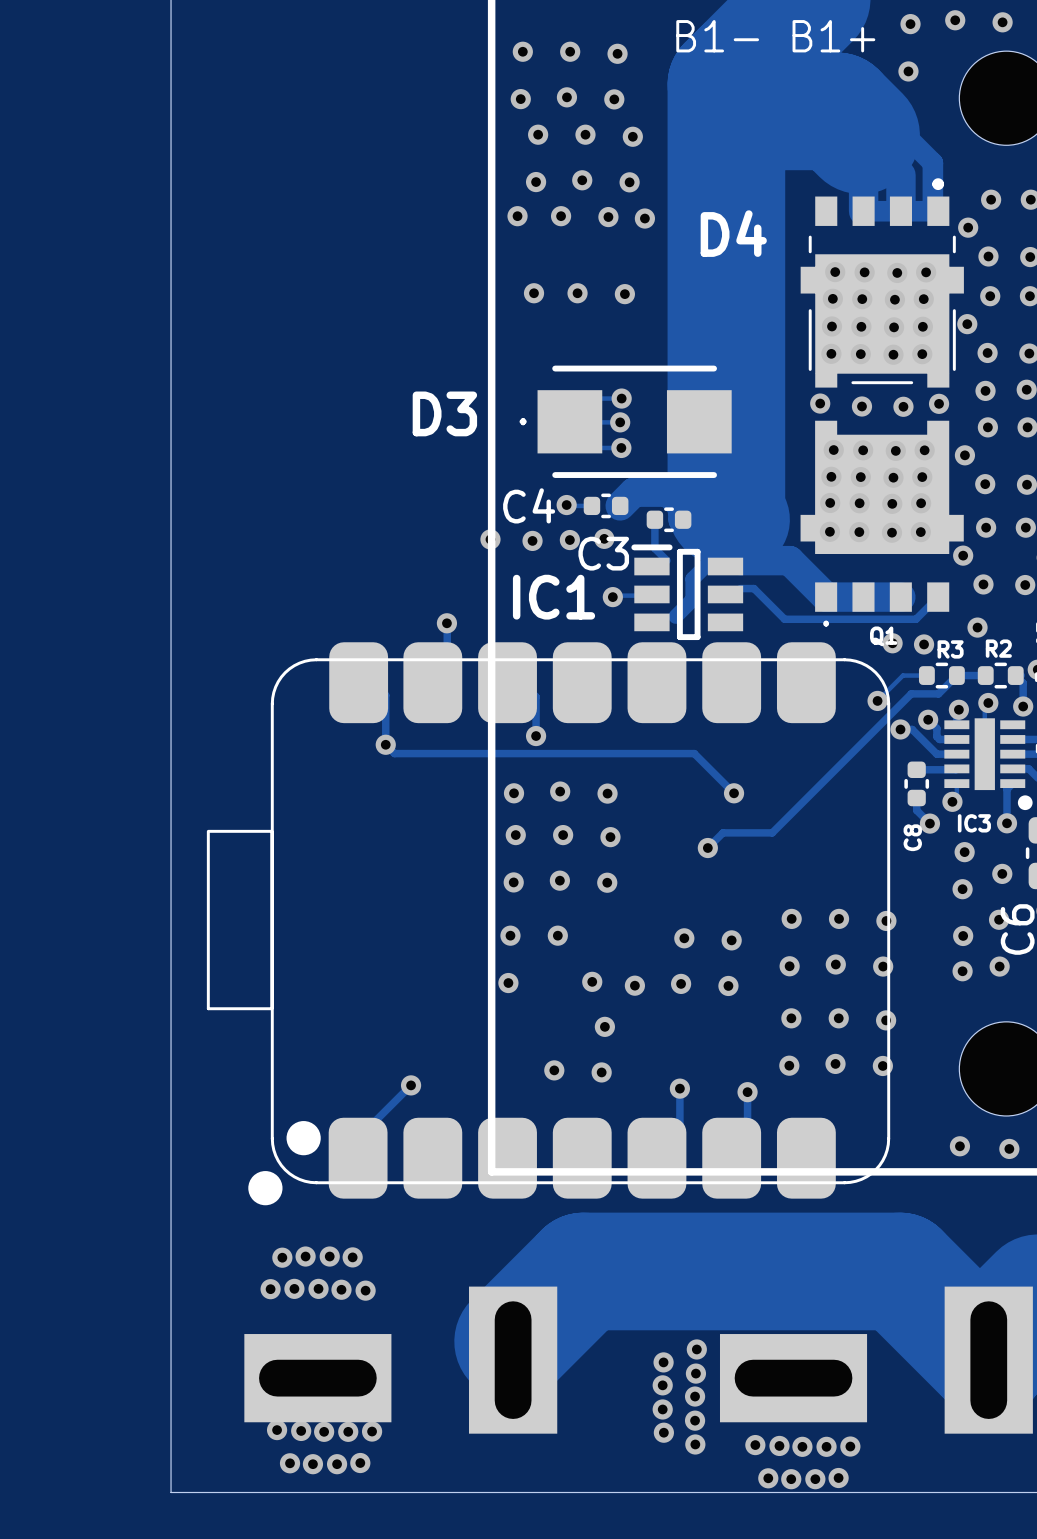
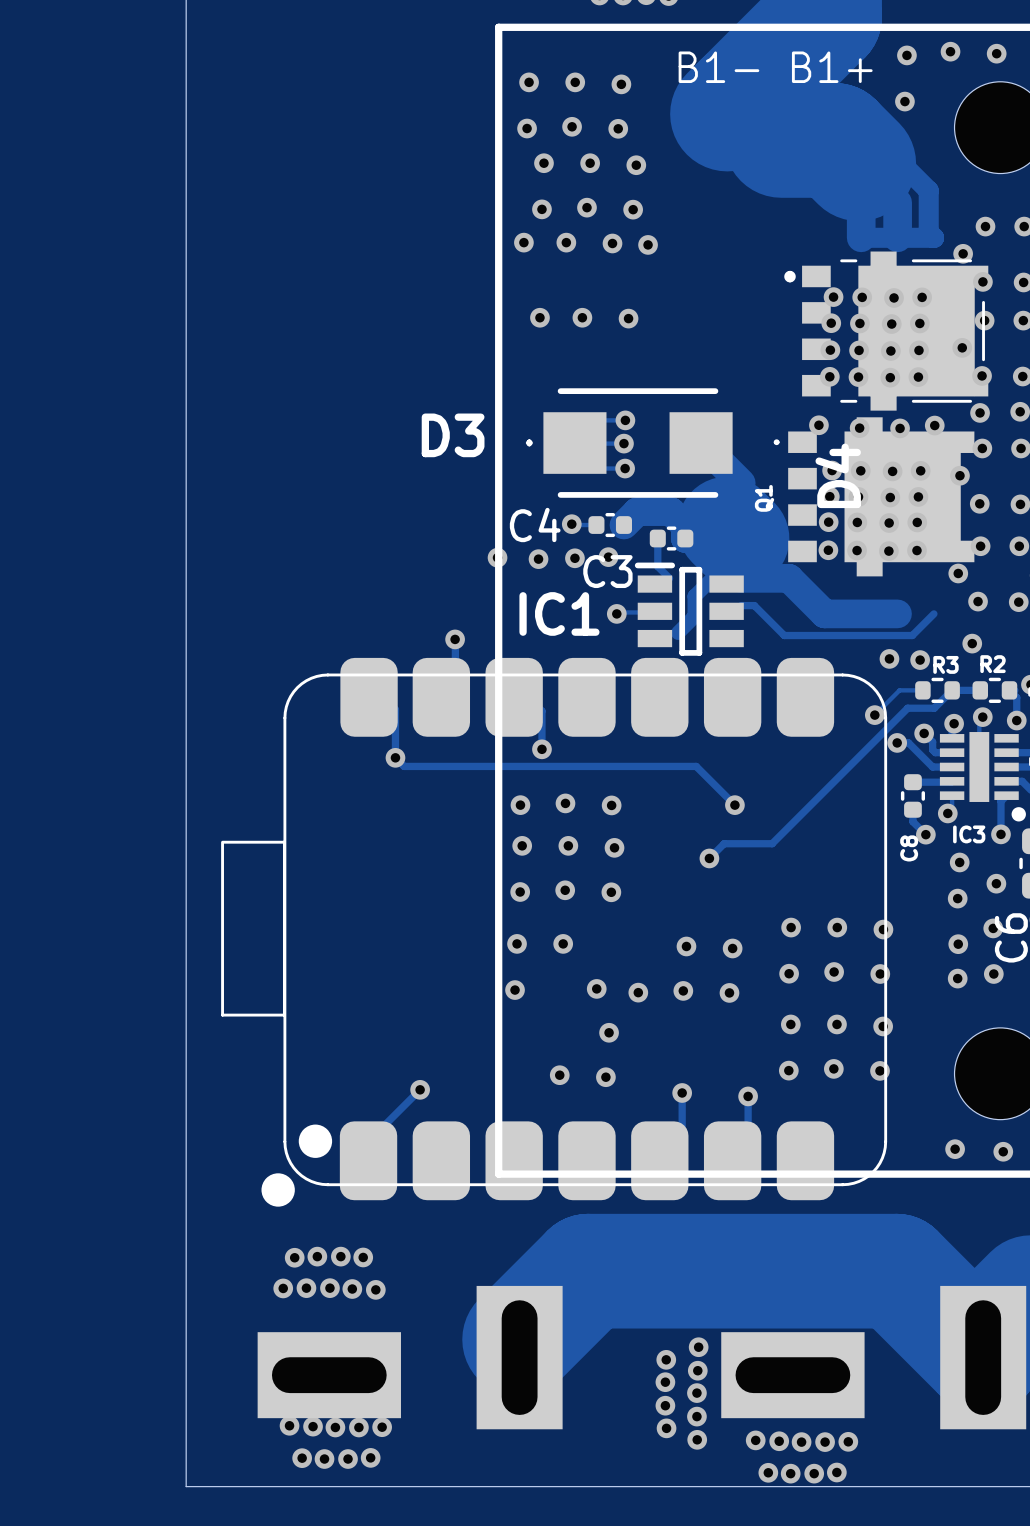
track: (726, 84) (726, 507) -> none
D4 rotation: 0° (882, 282) -> 90° counterclockwise (886, 331)
Q1 rotation: 0° (882, 523) -> 90° clockwise (874, 496)

